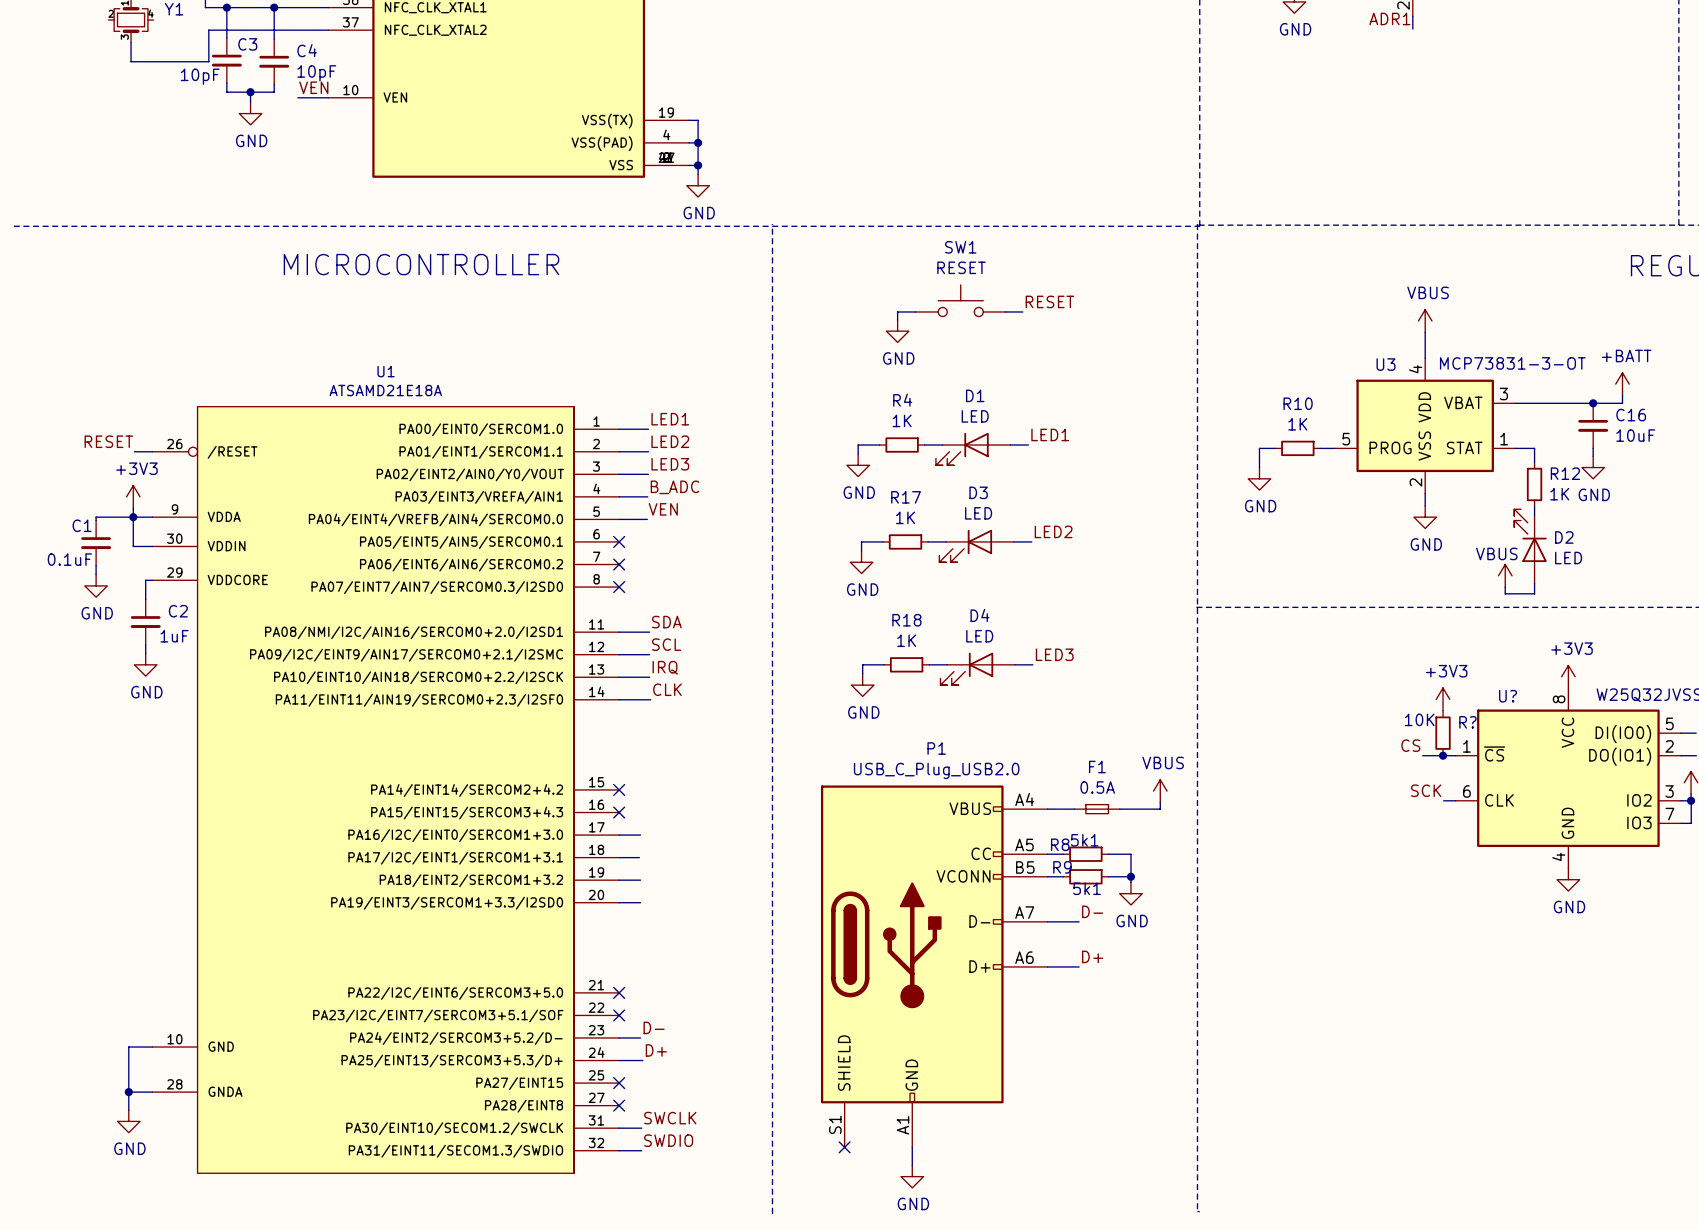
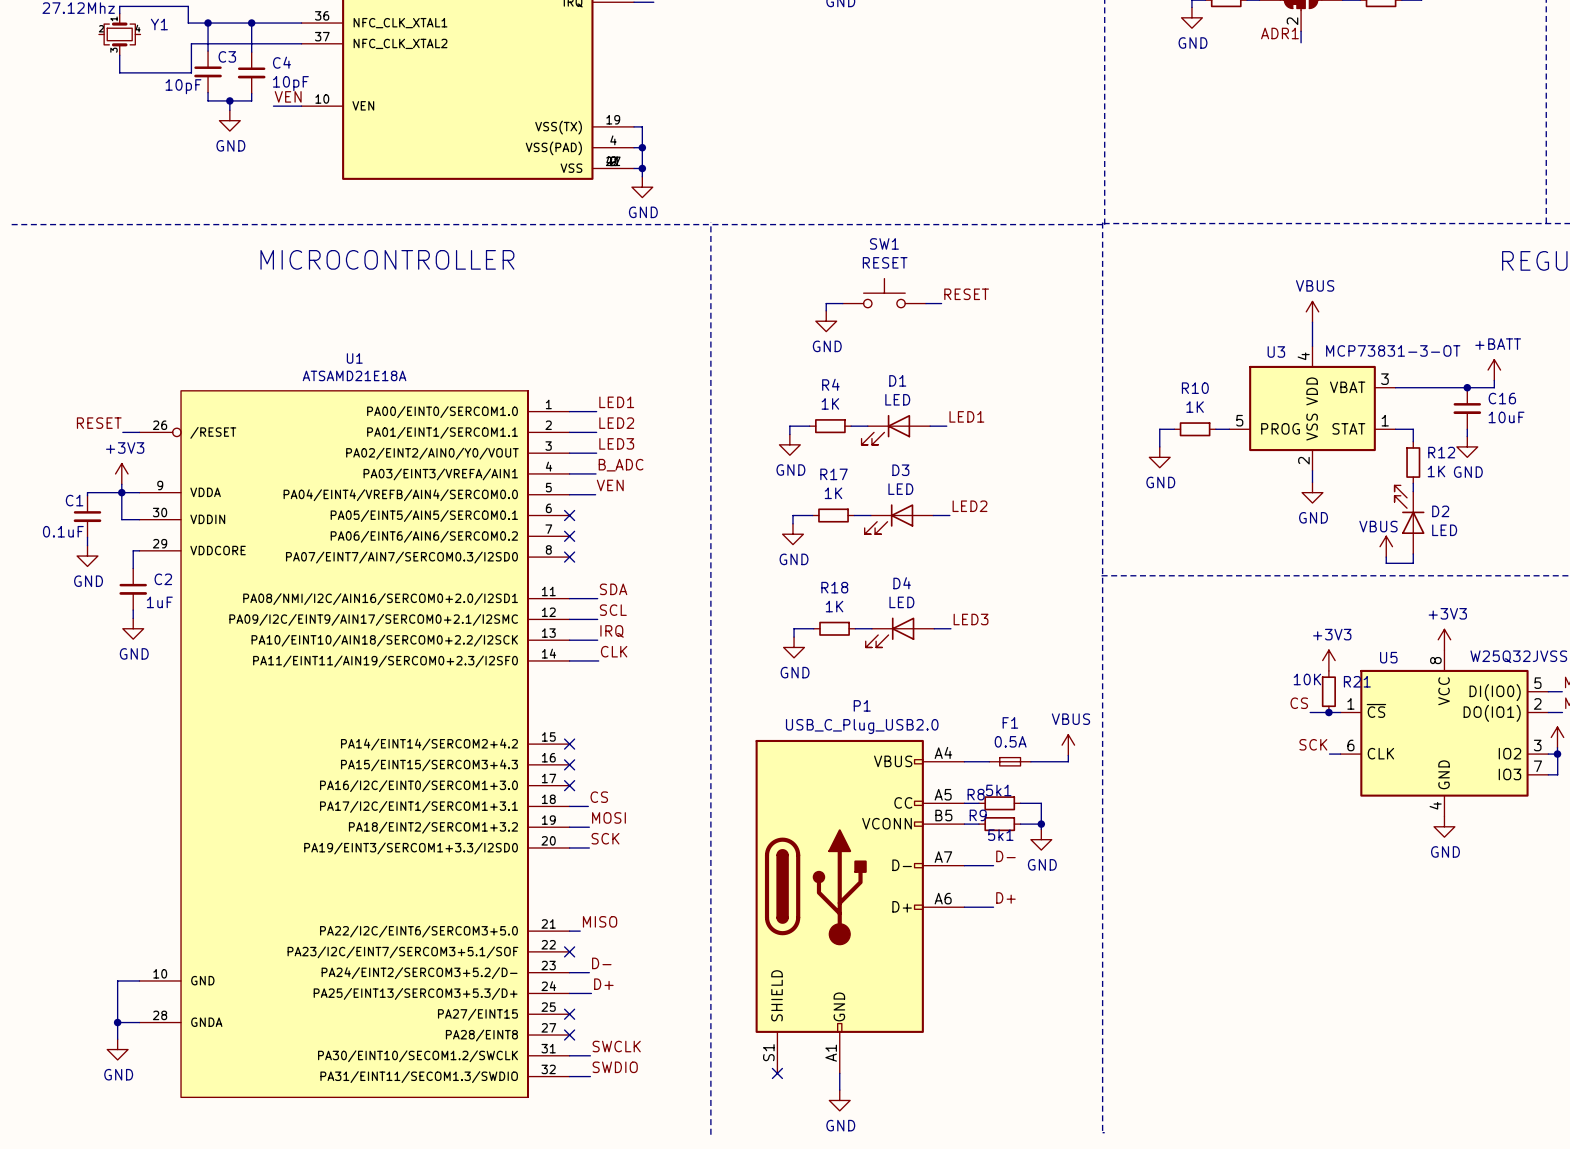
U? name: U? (1507, 696) -> U5 (1388, 657)
R? name: R? (1467, 722) -> R21 (1357, 681)
wire: (619, 835) (640, 835) -> none
no-connect mark: none -> (569, 785)
label: none -> CS (599, 797)
label: none -> MOSI (608, 817)
label: none -> SCK (605, 838)
label: none -> MISO (600, 921)
wire: none -> (569, 931) (580, 931)
no-connect mark: (619, 992) -> none

